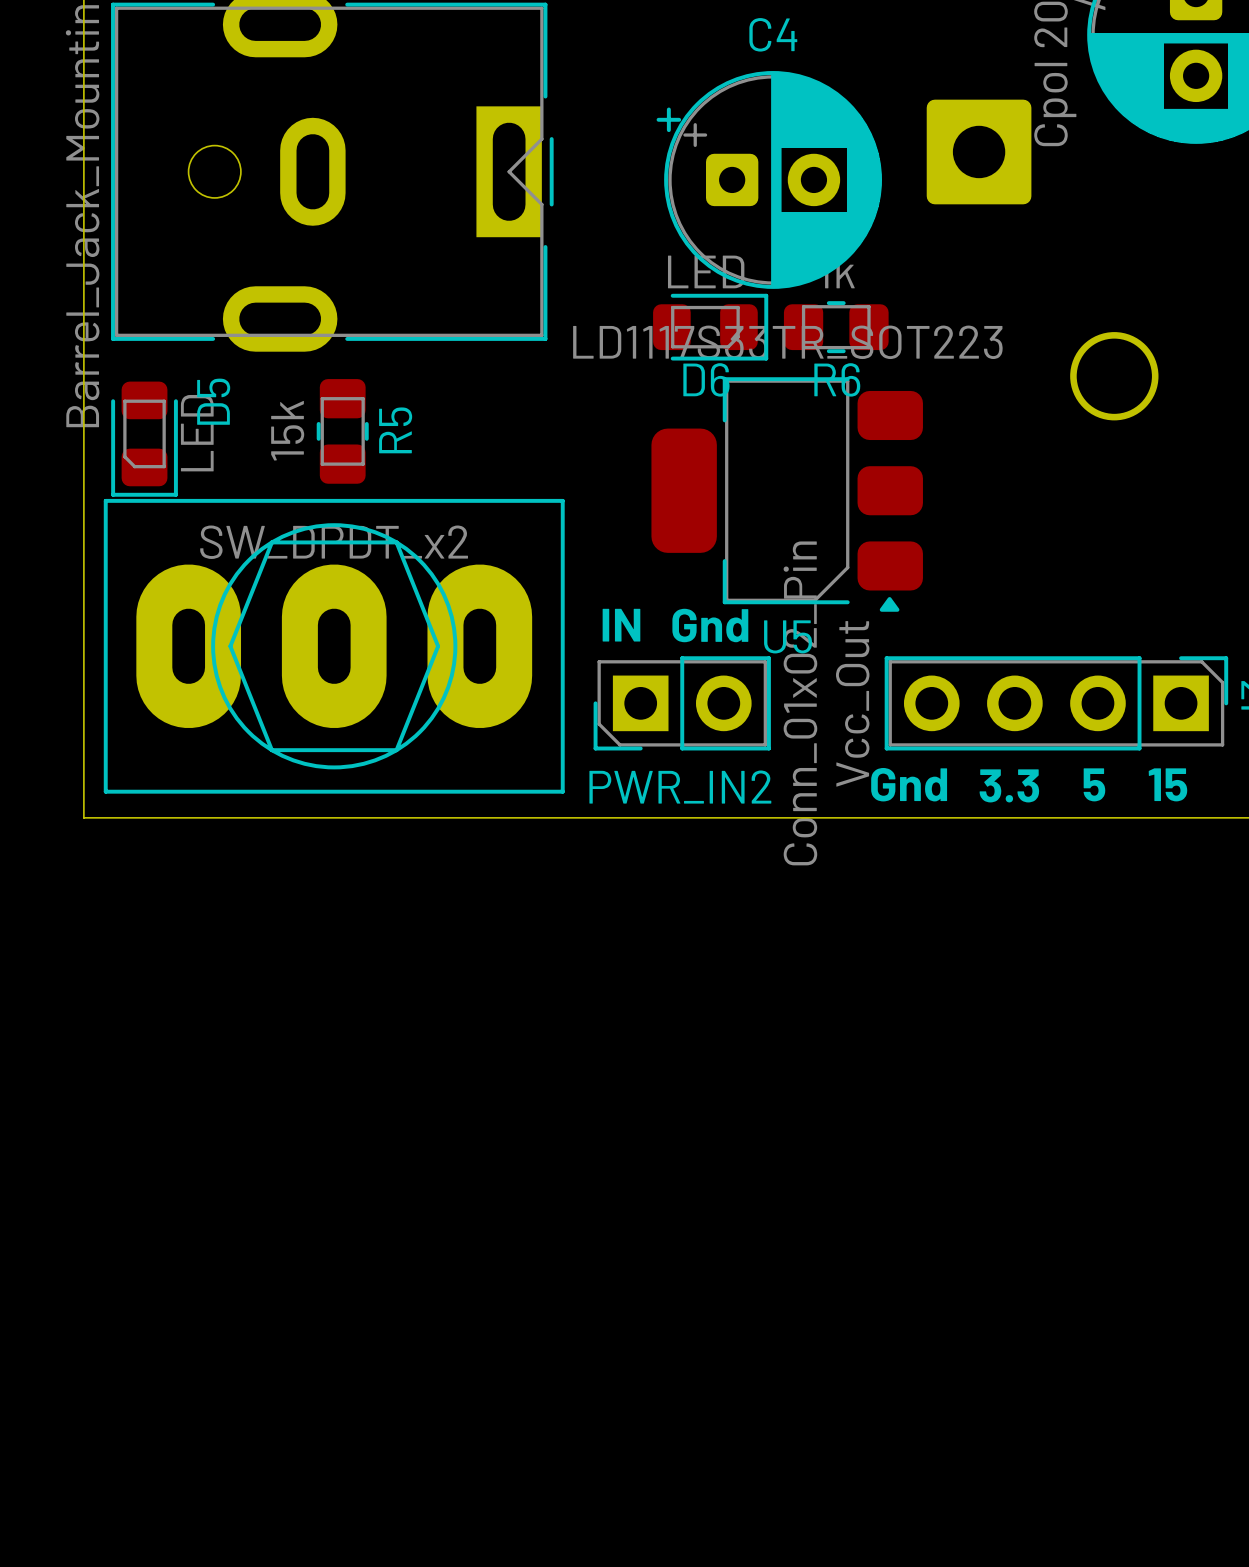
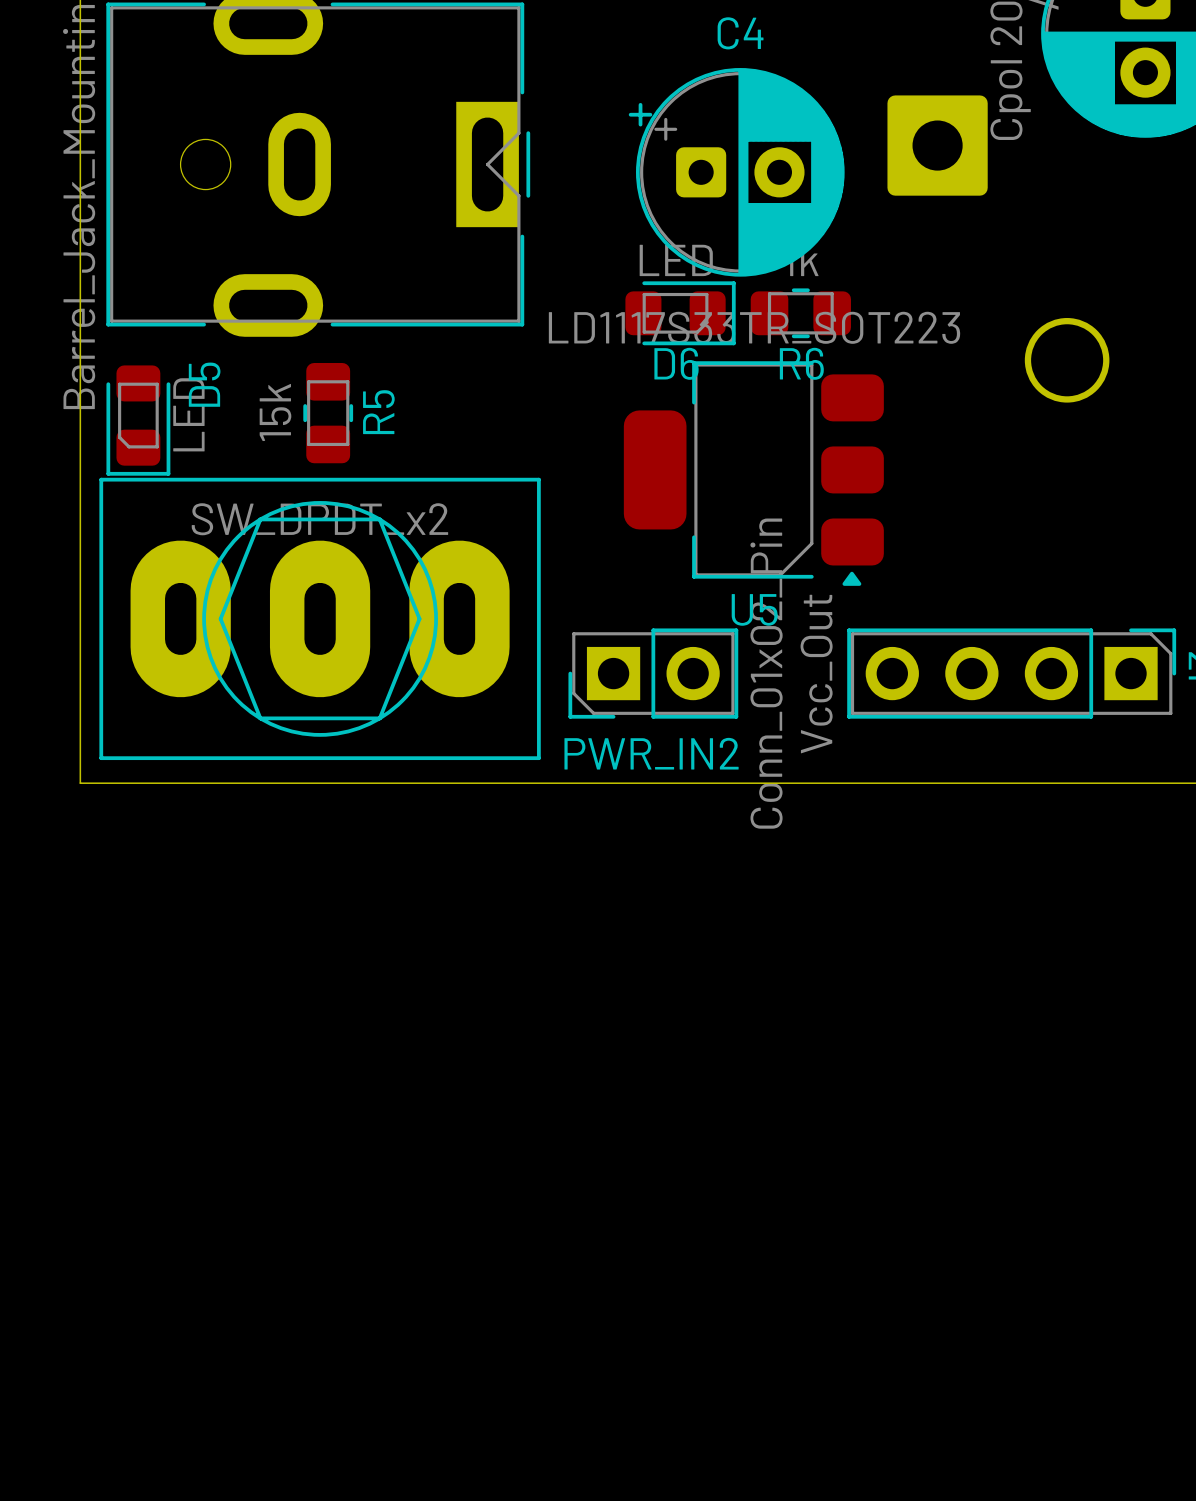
text: IN (621, 625) -> none
text: Gnd (710, 625) -> none
text: Gnd (909, 784) -> none
text: 5 (1094, 784) -> none
text: 15 (1167, 784) -> none
text: 3.3 (1009, 785) -> none

